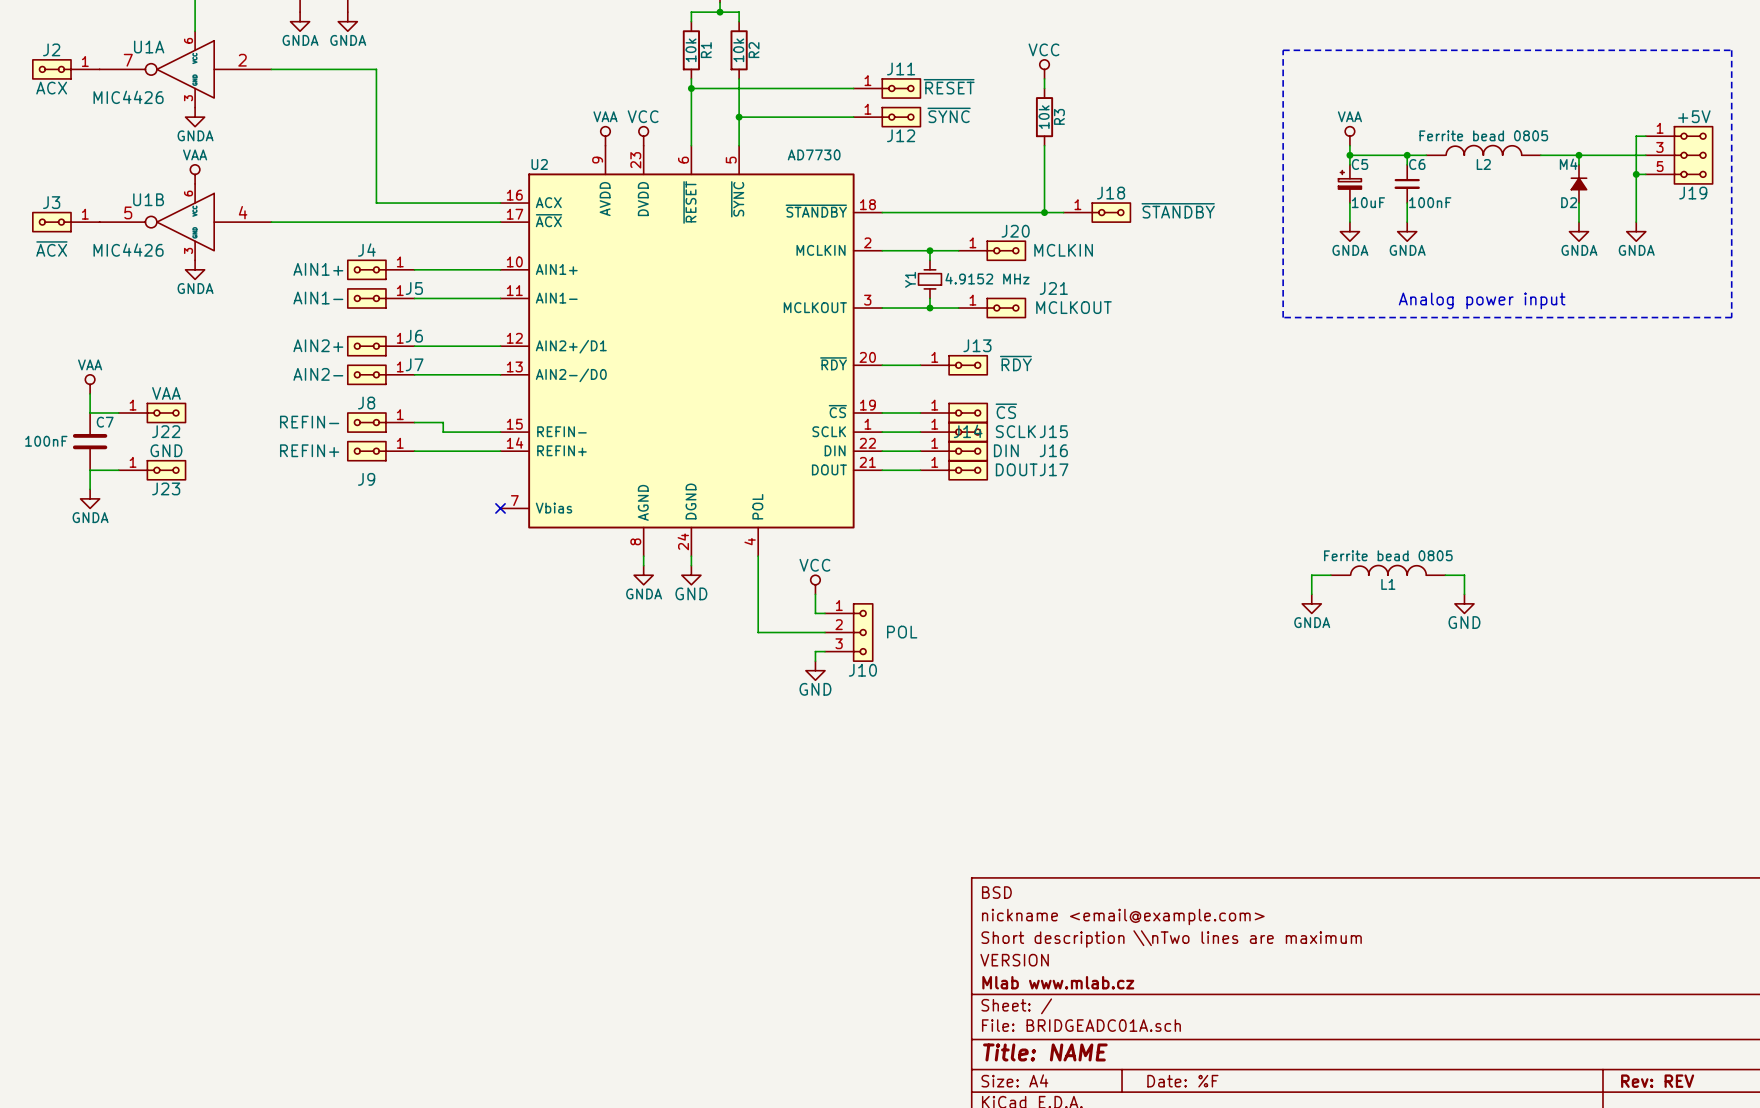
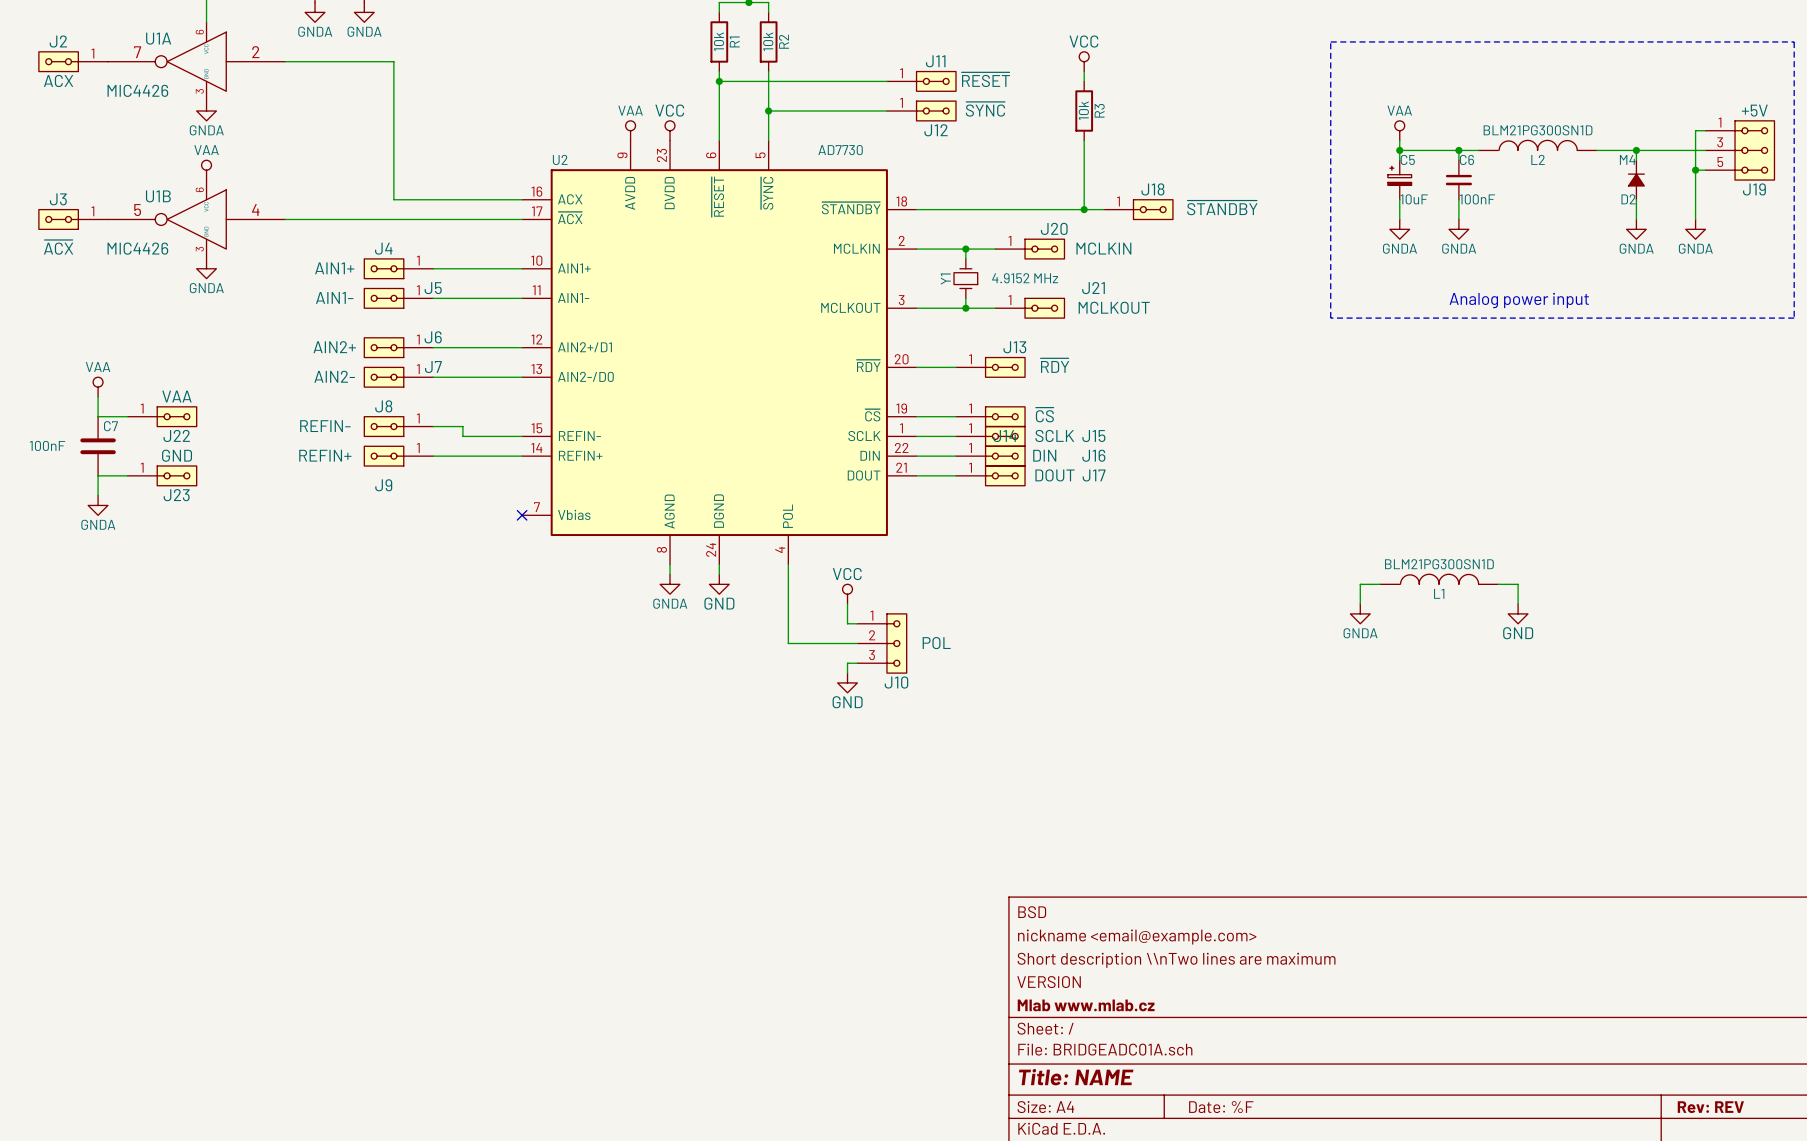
L2 value: Ferrite bead 0805 (1483, 135) -> BLM21PG300SN1D (1538, 130)
L1 value: Ferrite bead 0805 (1388, 555) -> BLM21PG300SN1D (1439, 564)

